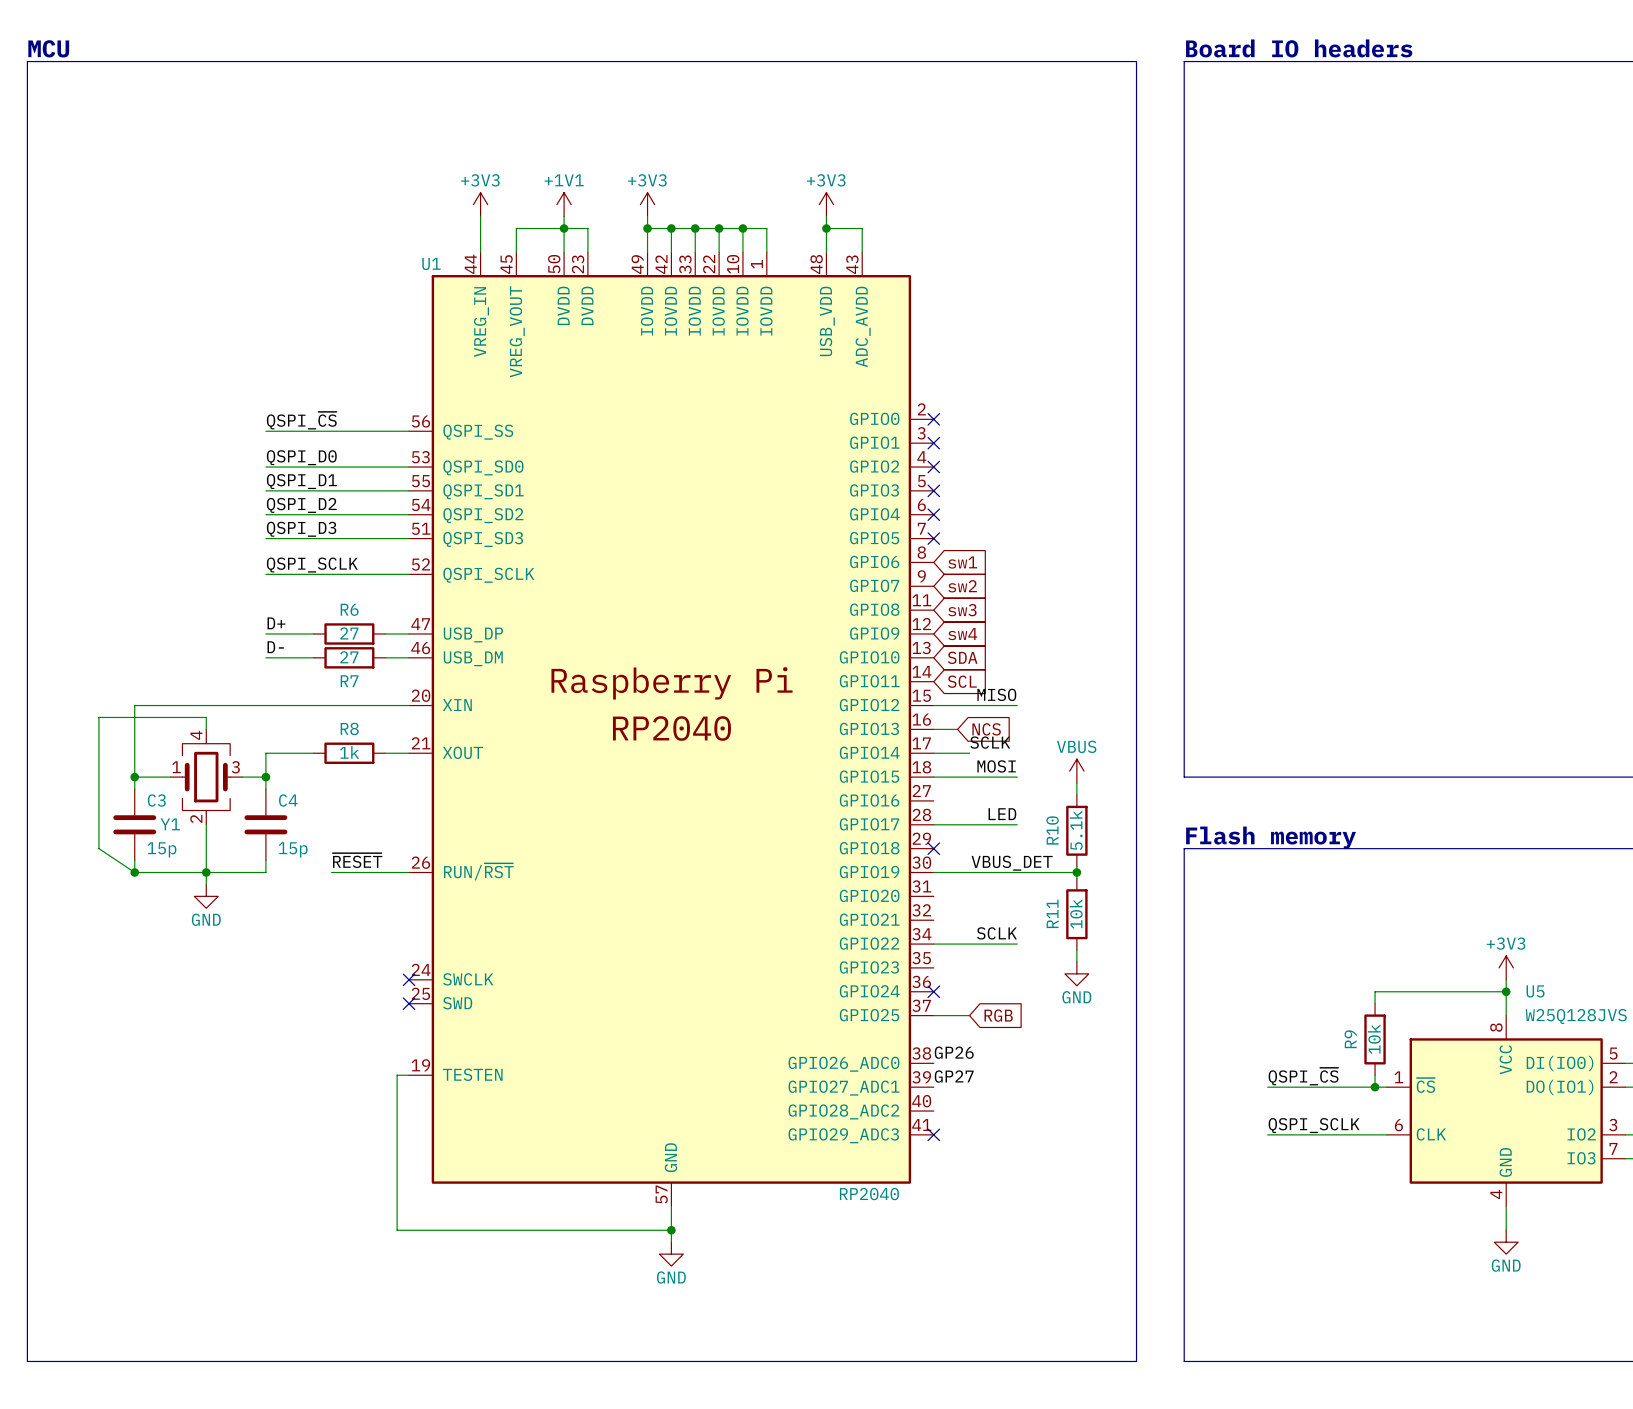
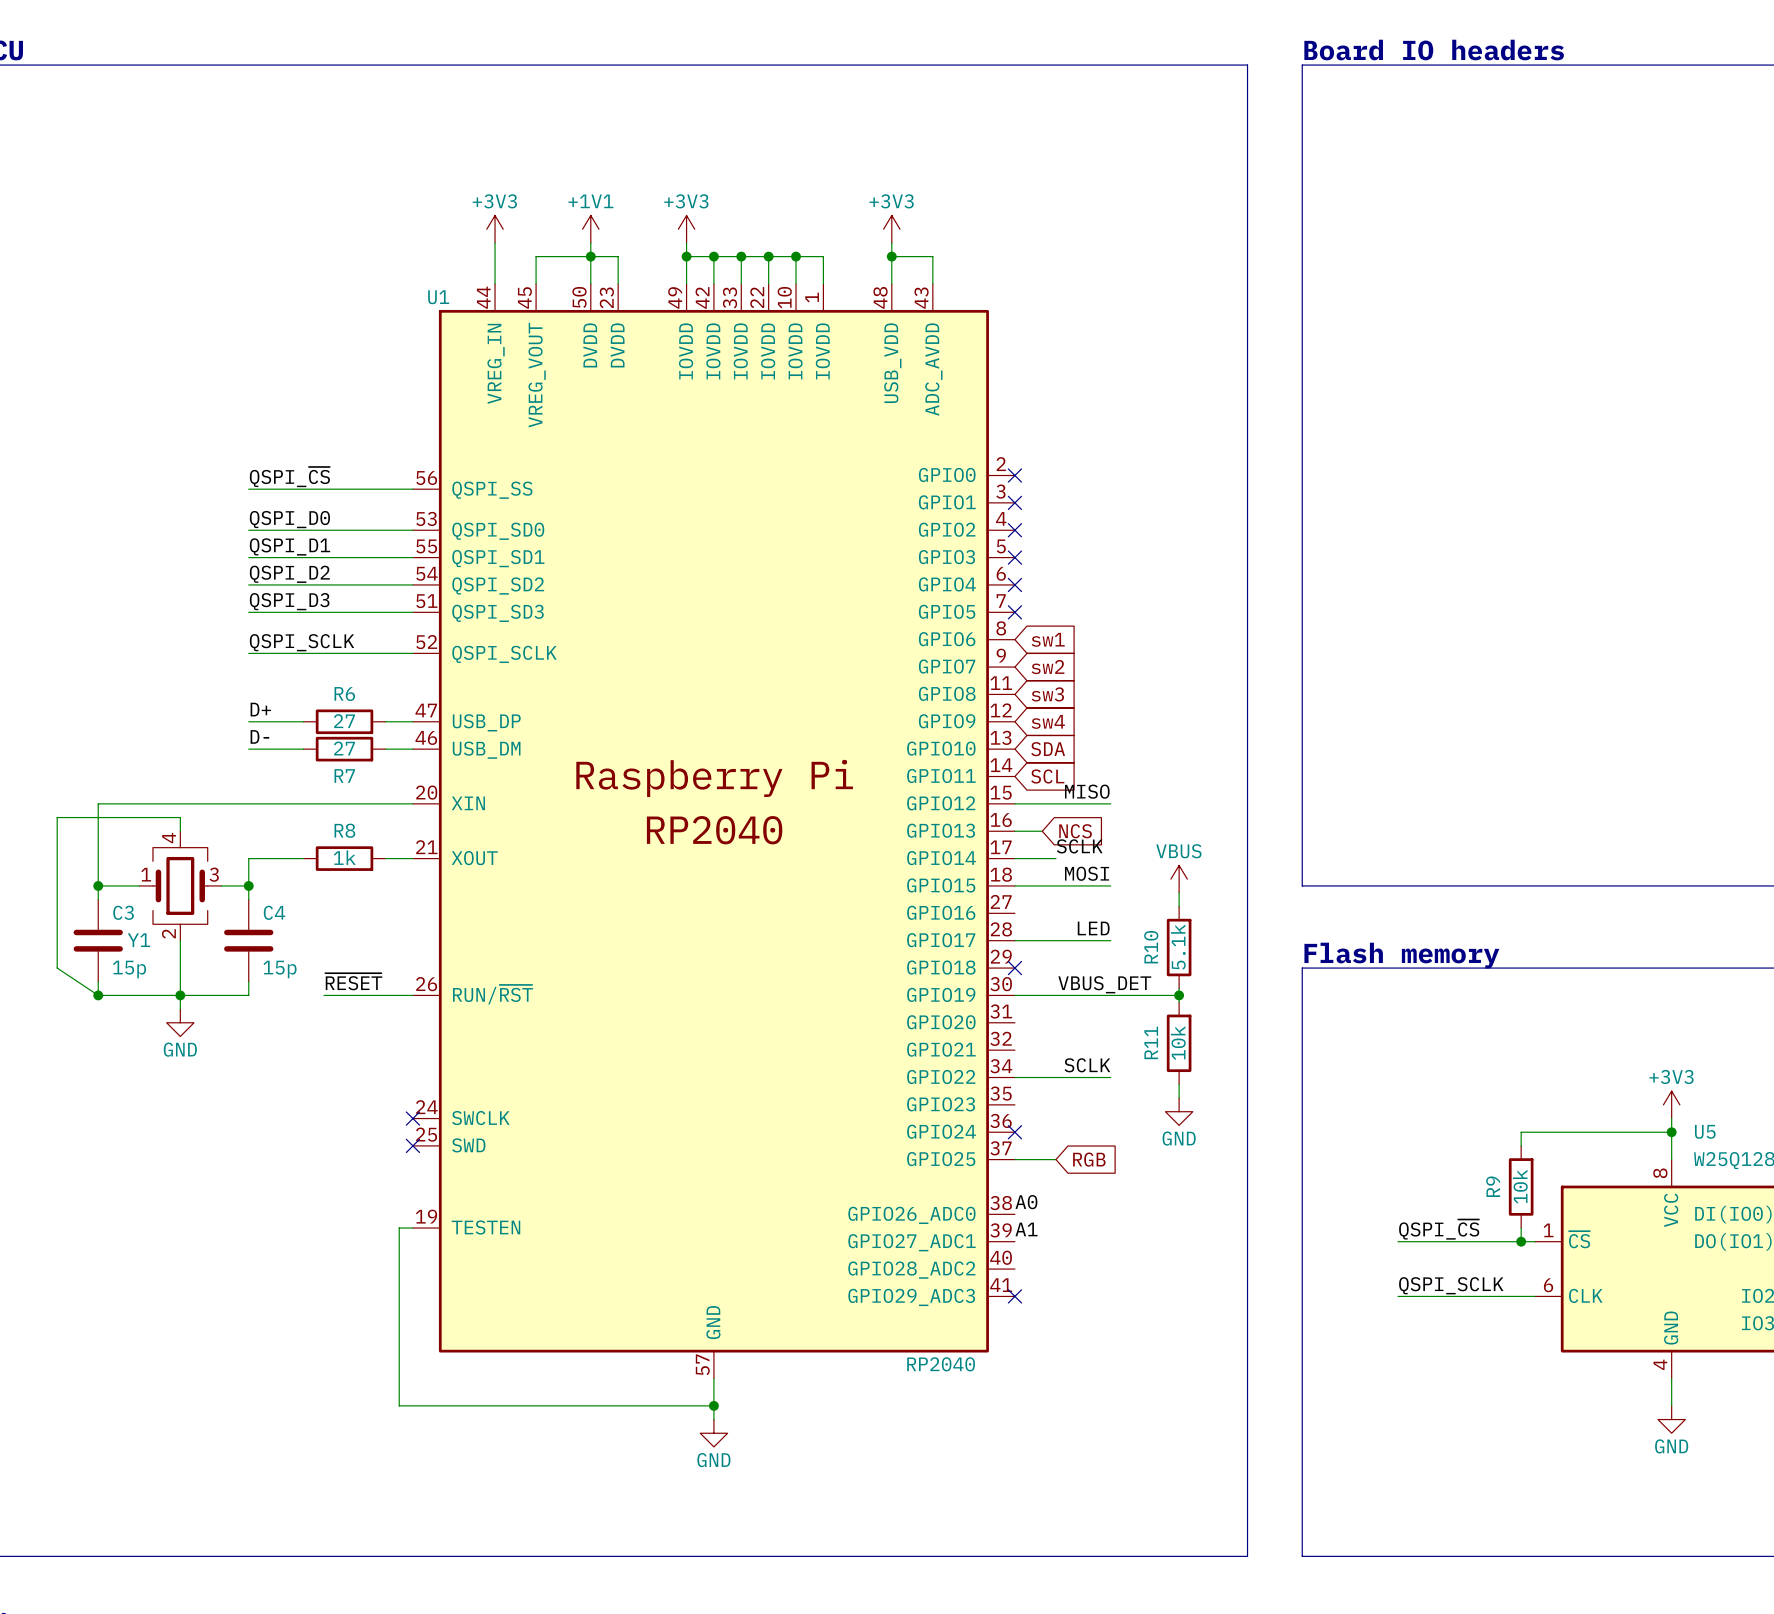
label: GP26 (954, 1052) -> A0 (1026, 1202)
label: GP27 (954, 1076) -> A1 (1026, 1229)

